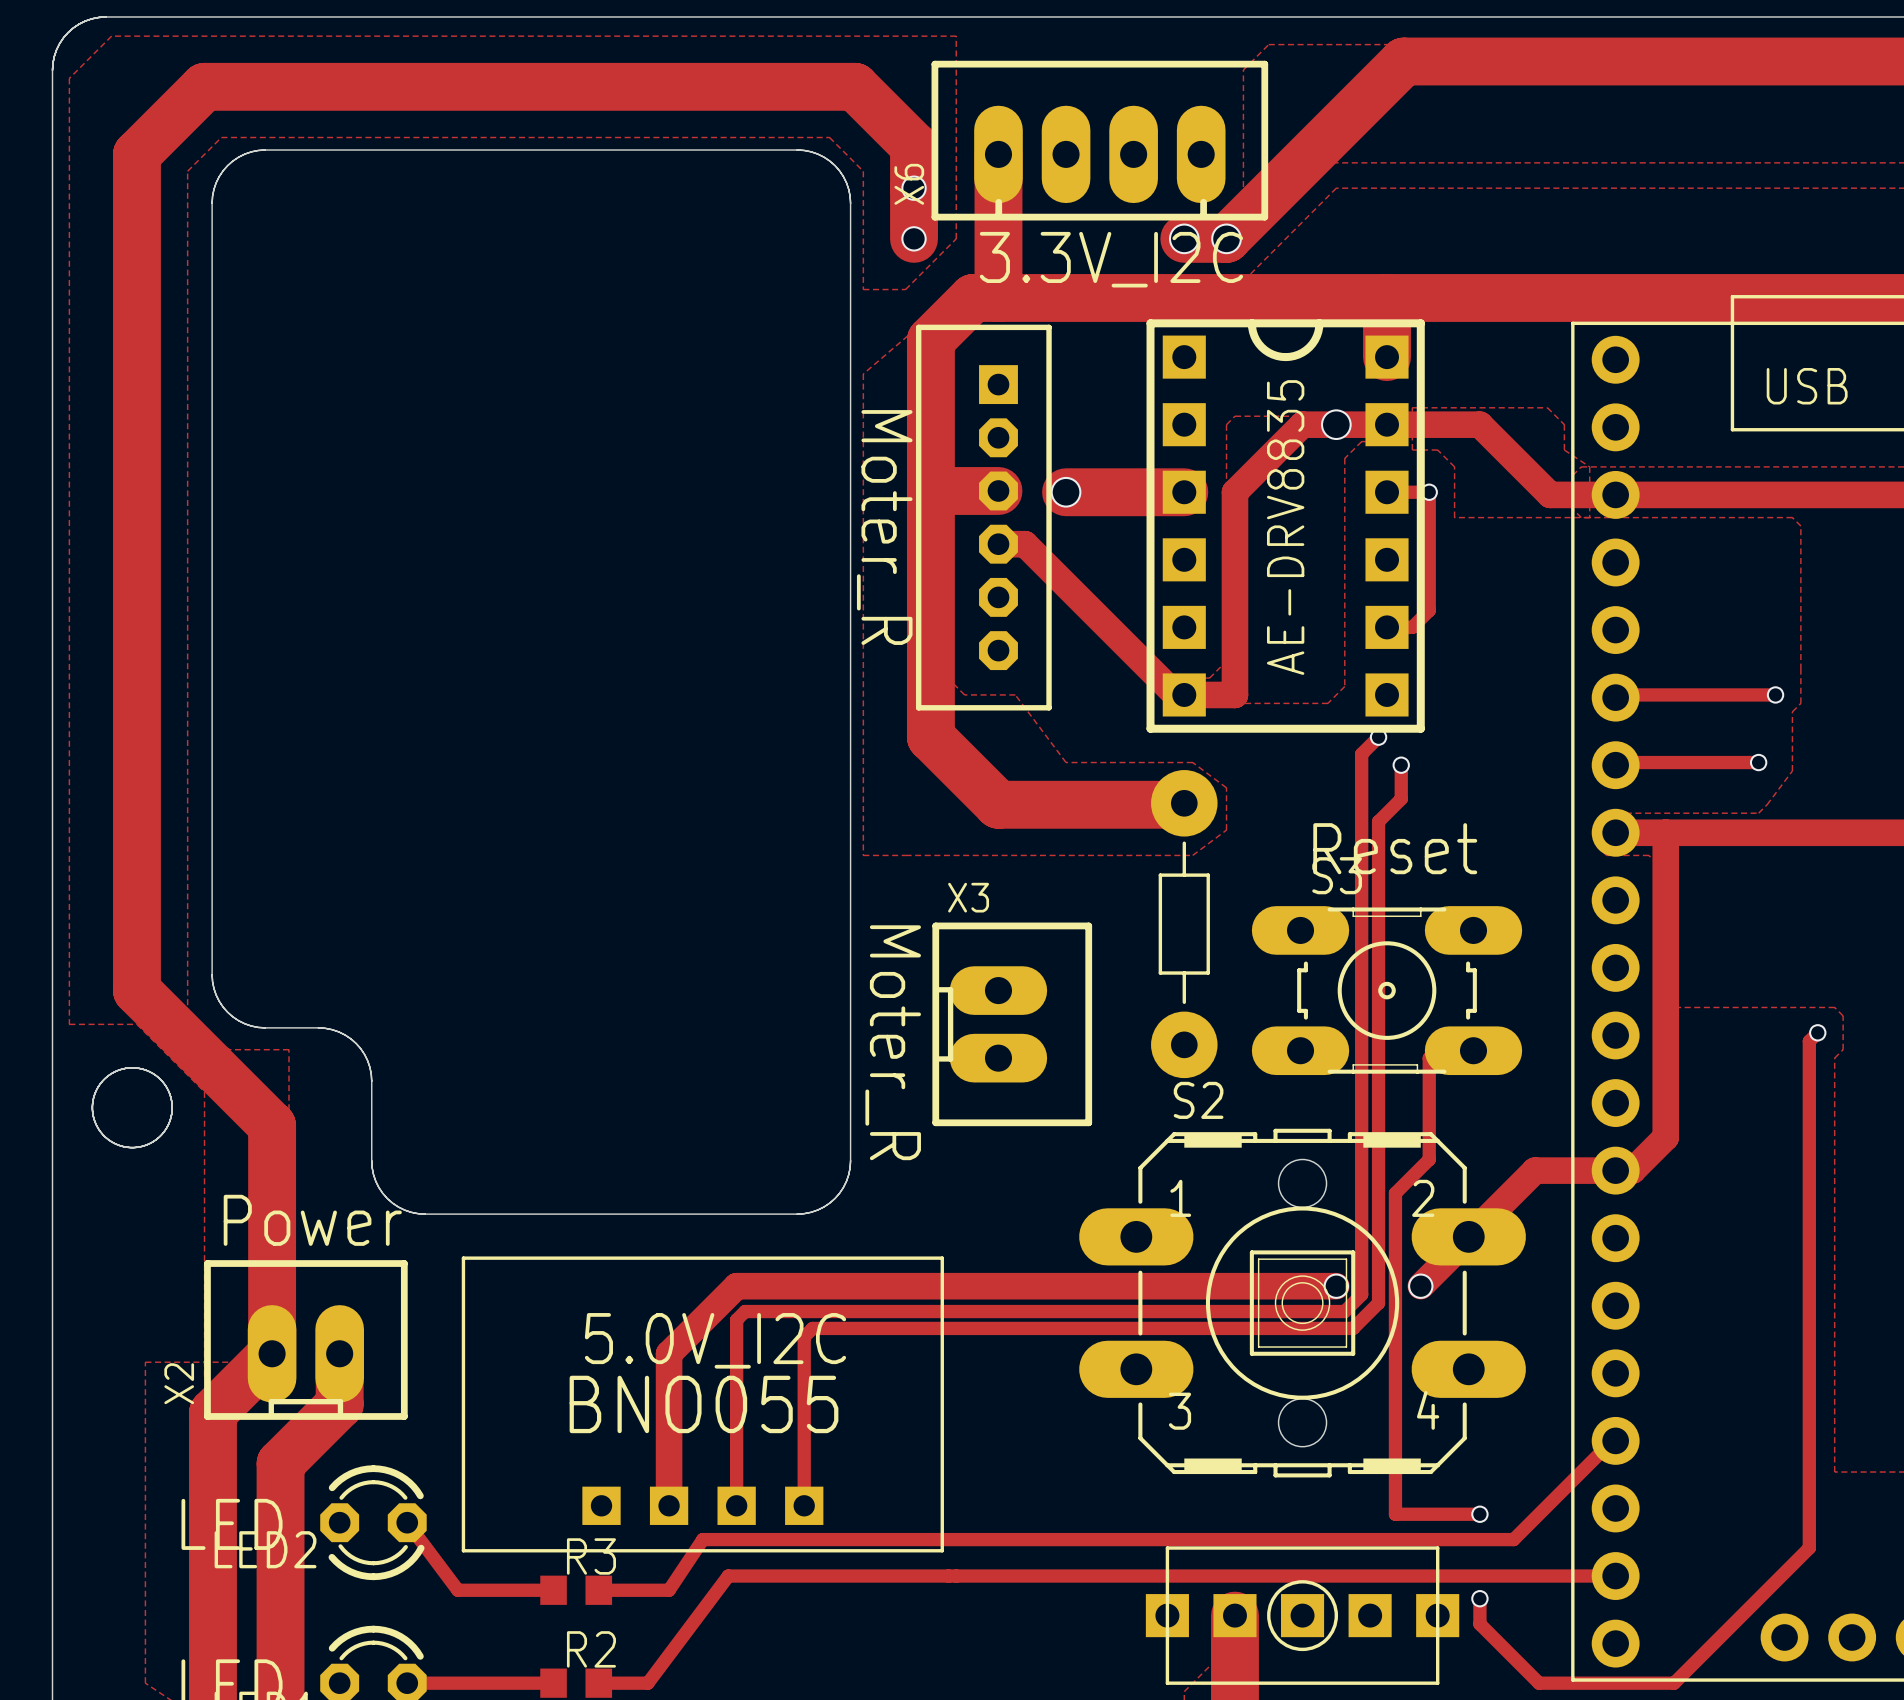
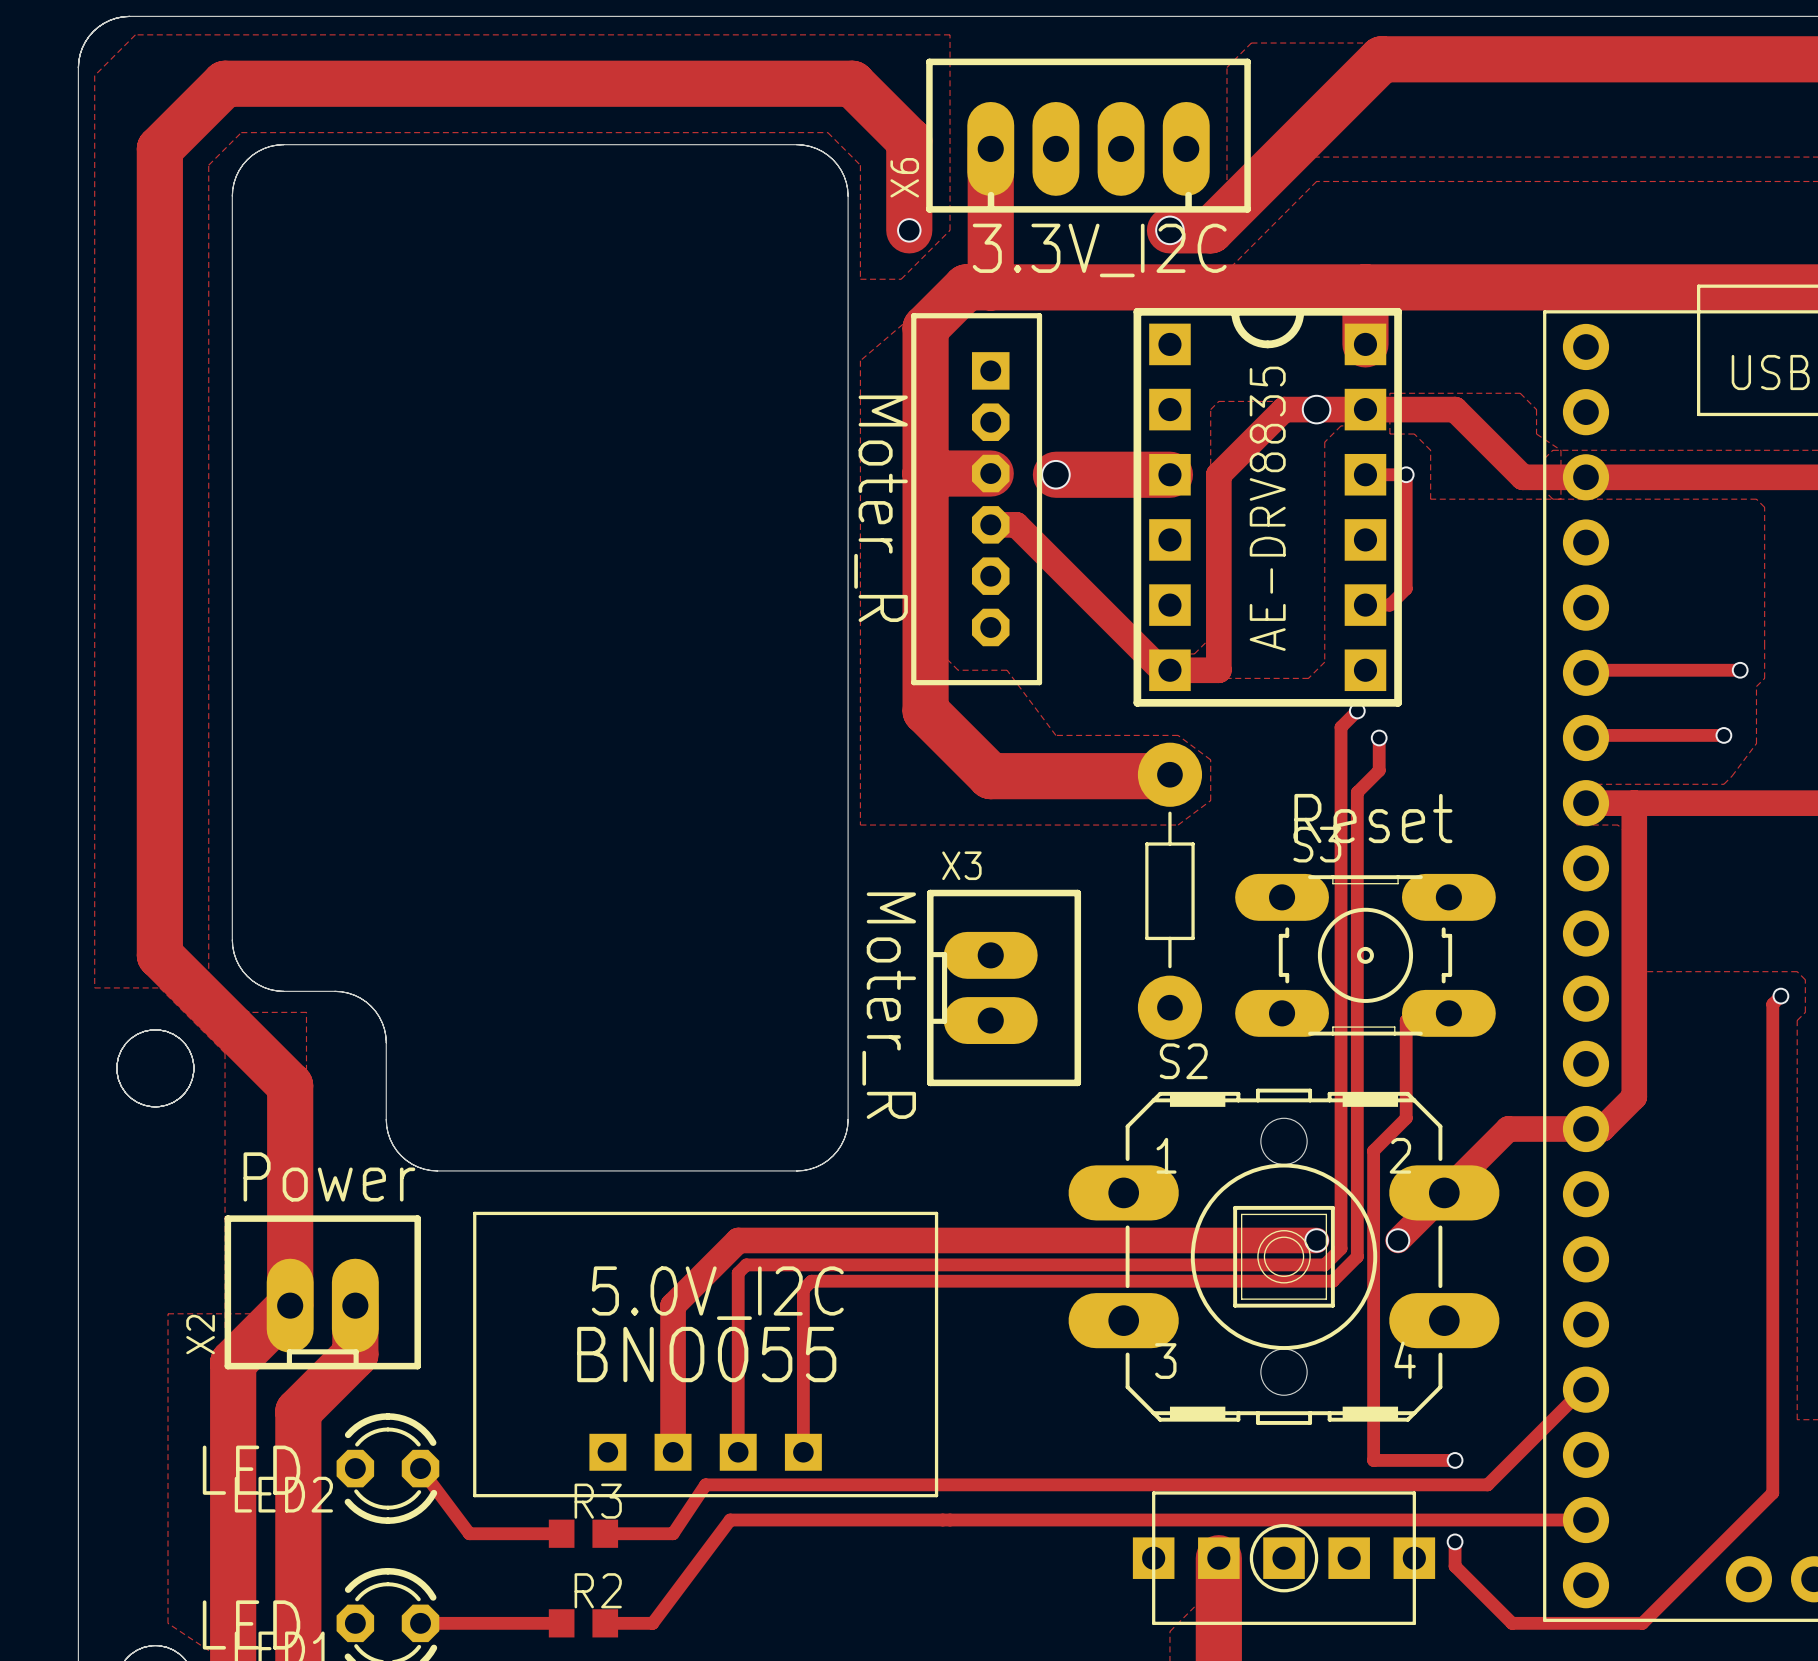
via: (914, 188) -> none
via: (1226, 238) -> none

